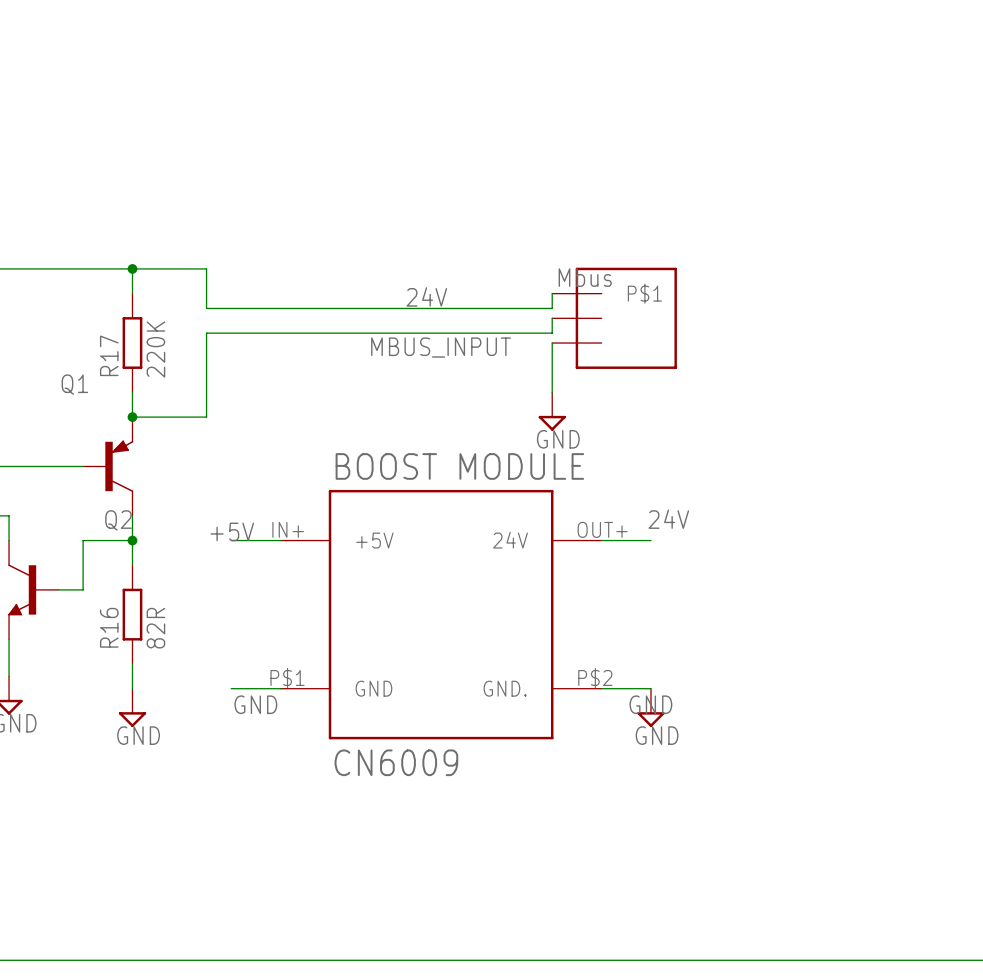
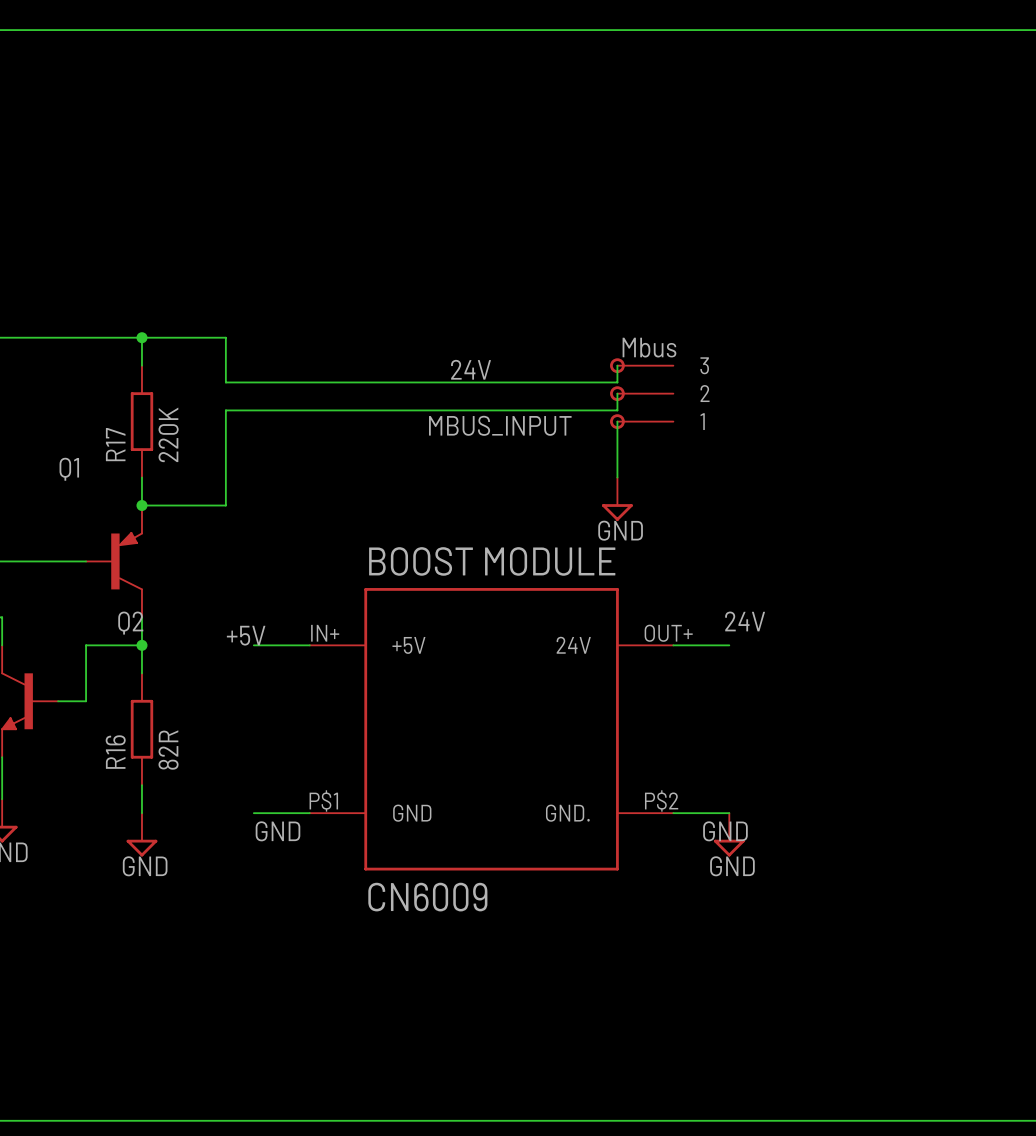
part: none -> (641, 393)
part: (614, 318) -> none

